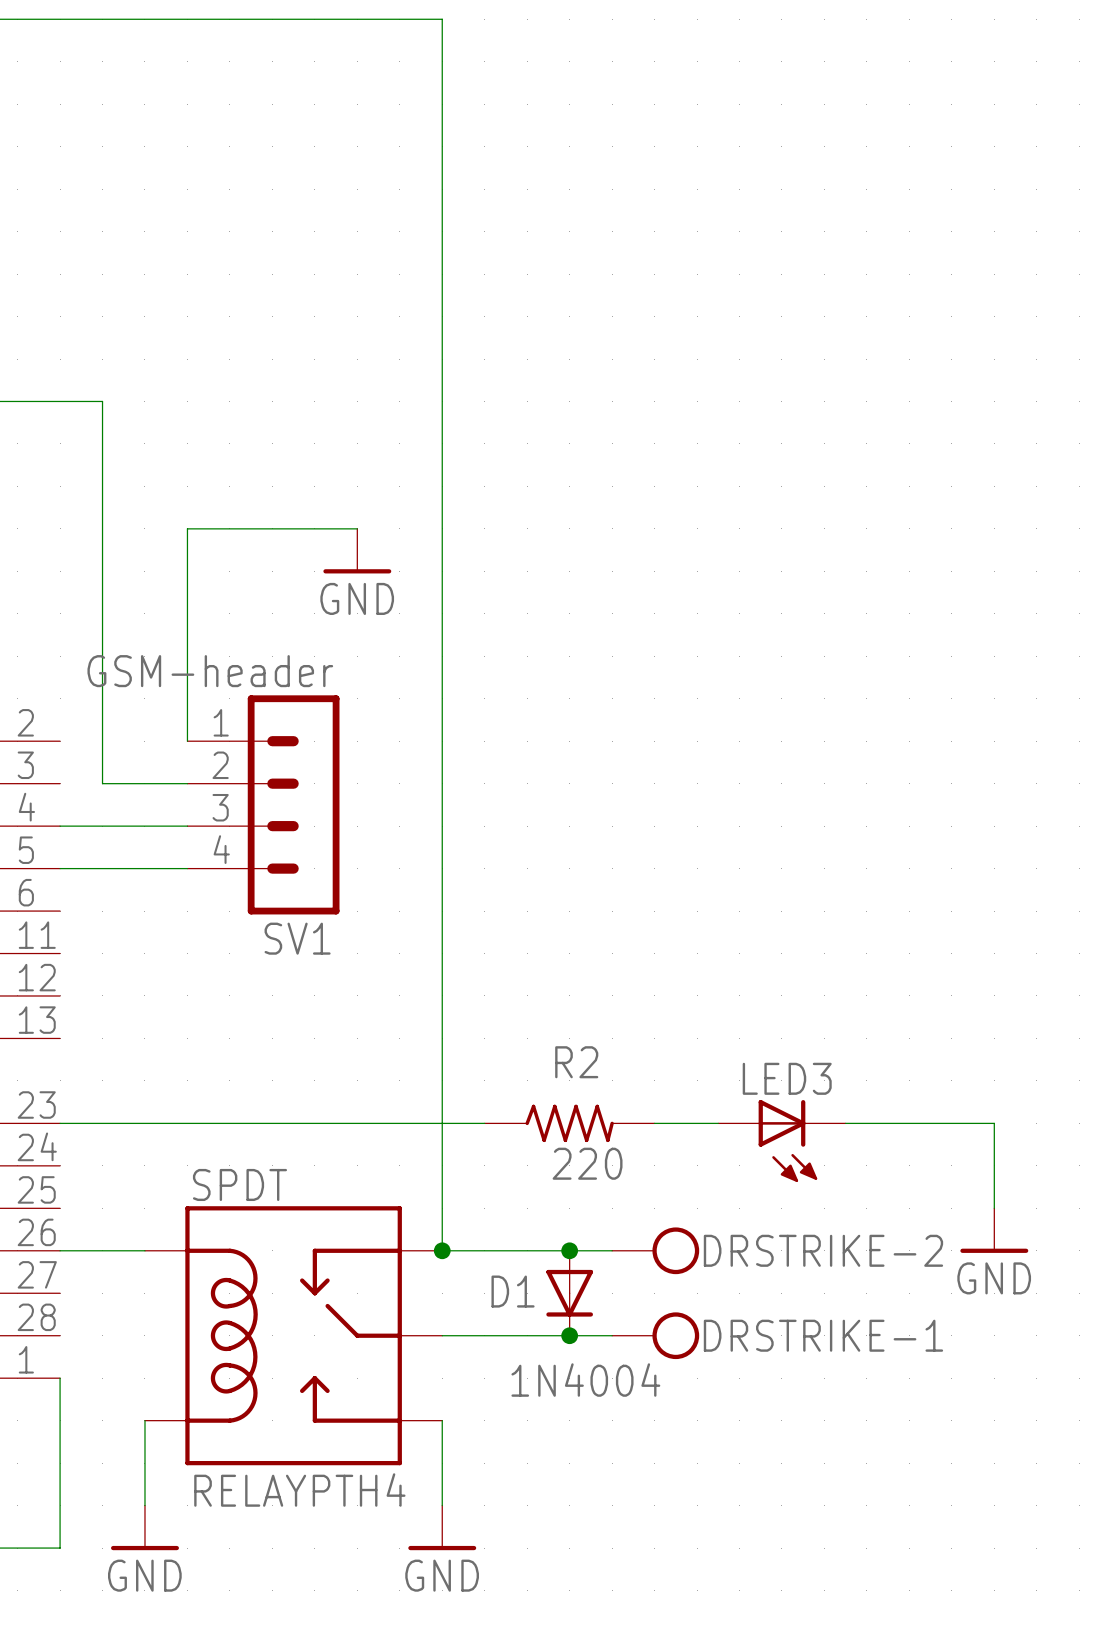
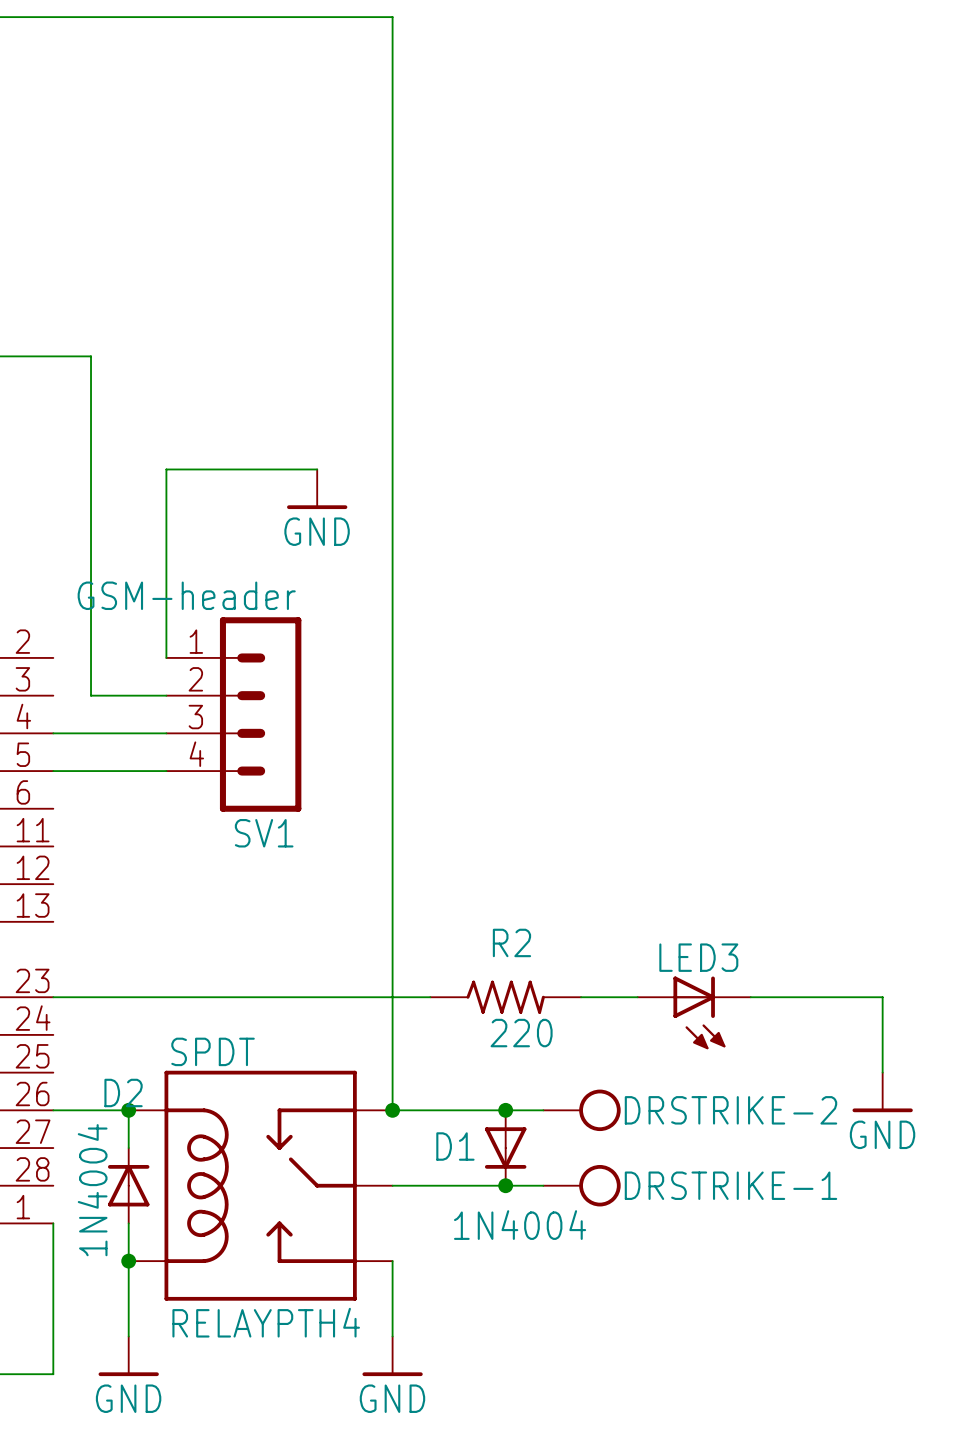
wire: none -> (128, 1110) (128, 1148)
junction: none -> (128, 1110)
D2: none -> 1N4004 (128, 1185)
wire: none -> (128, 1223) (128, 1261)
junction: none -> (128, 1261)

